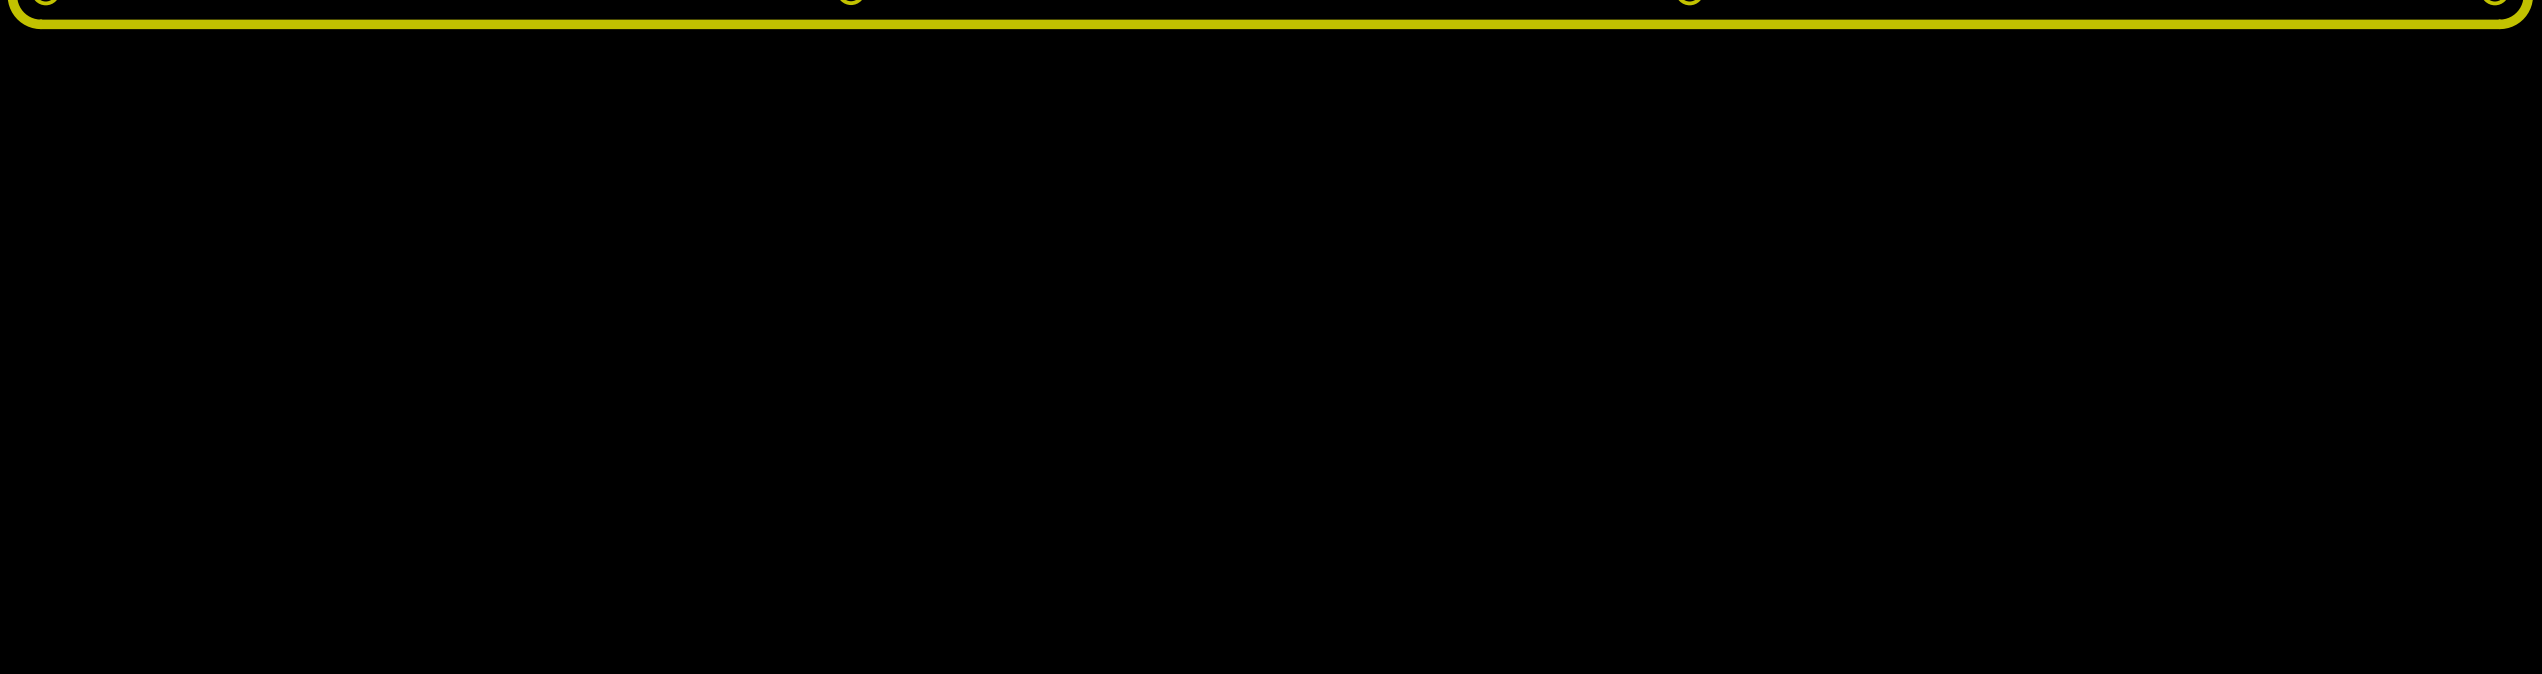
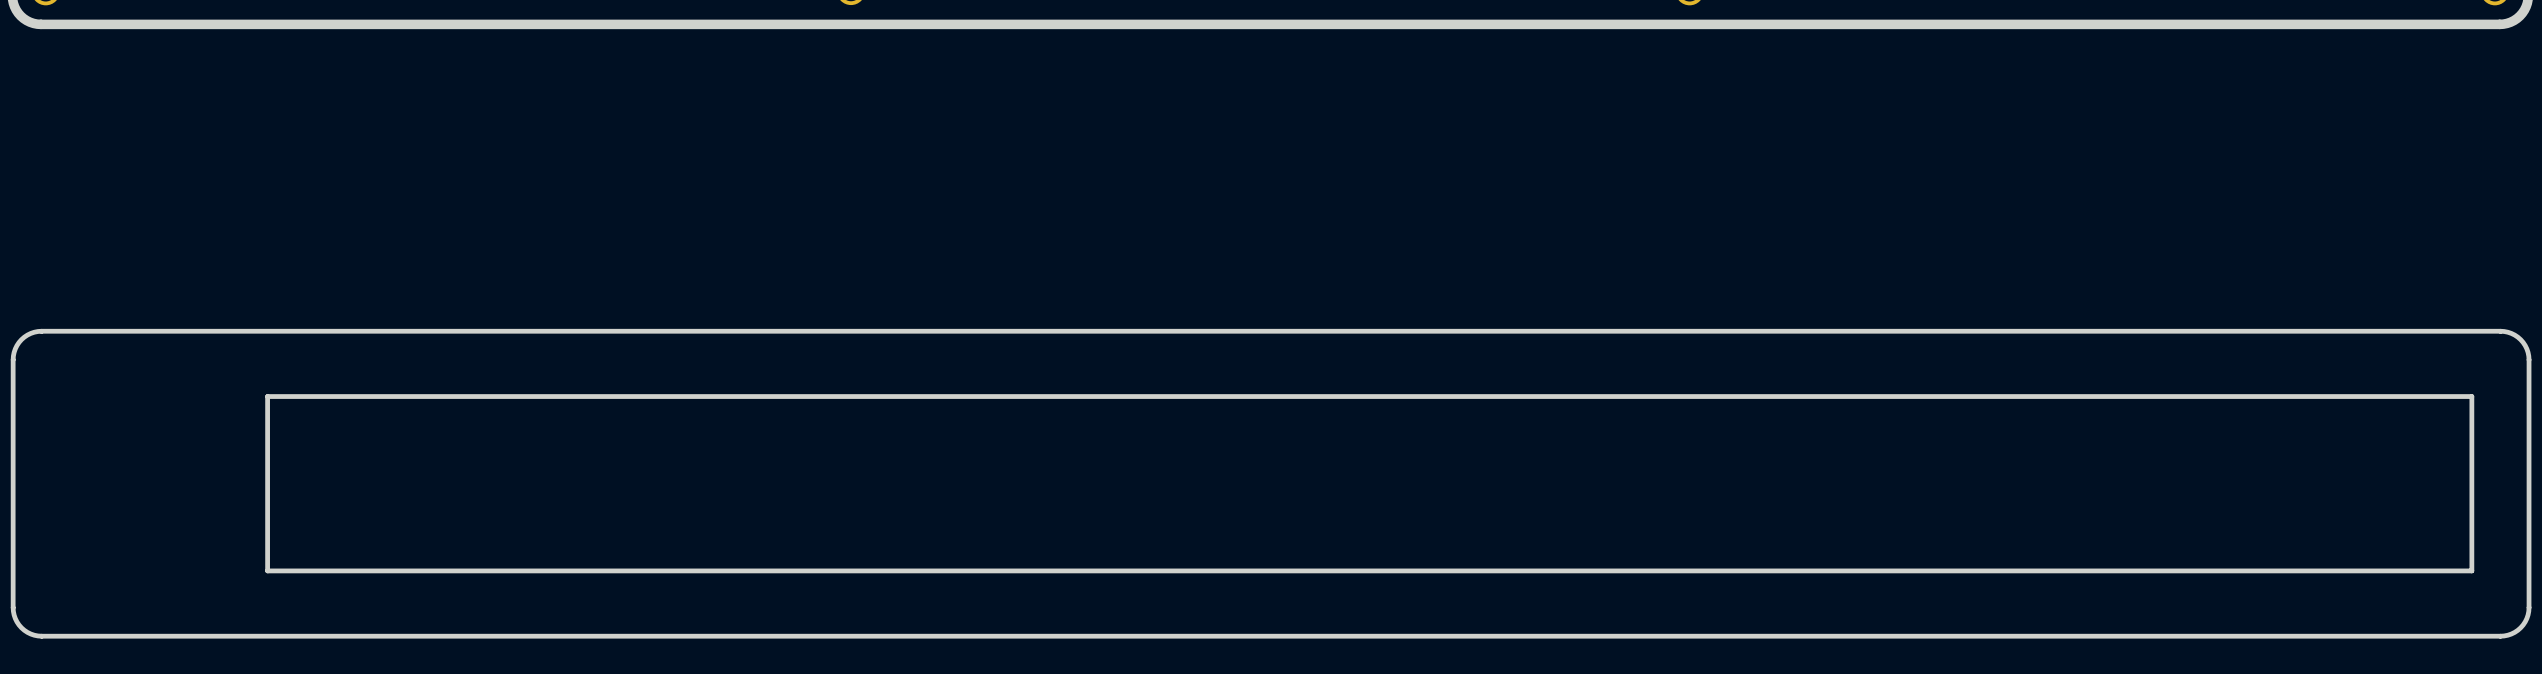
drawing: none -> [10, 328, 2532, 639]
board edge: none -> (2471, 396) (267, 396) (267, 570) (2471, 570) (2471, 396)

